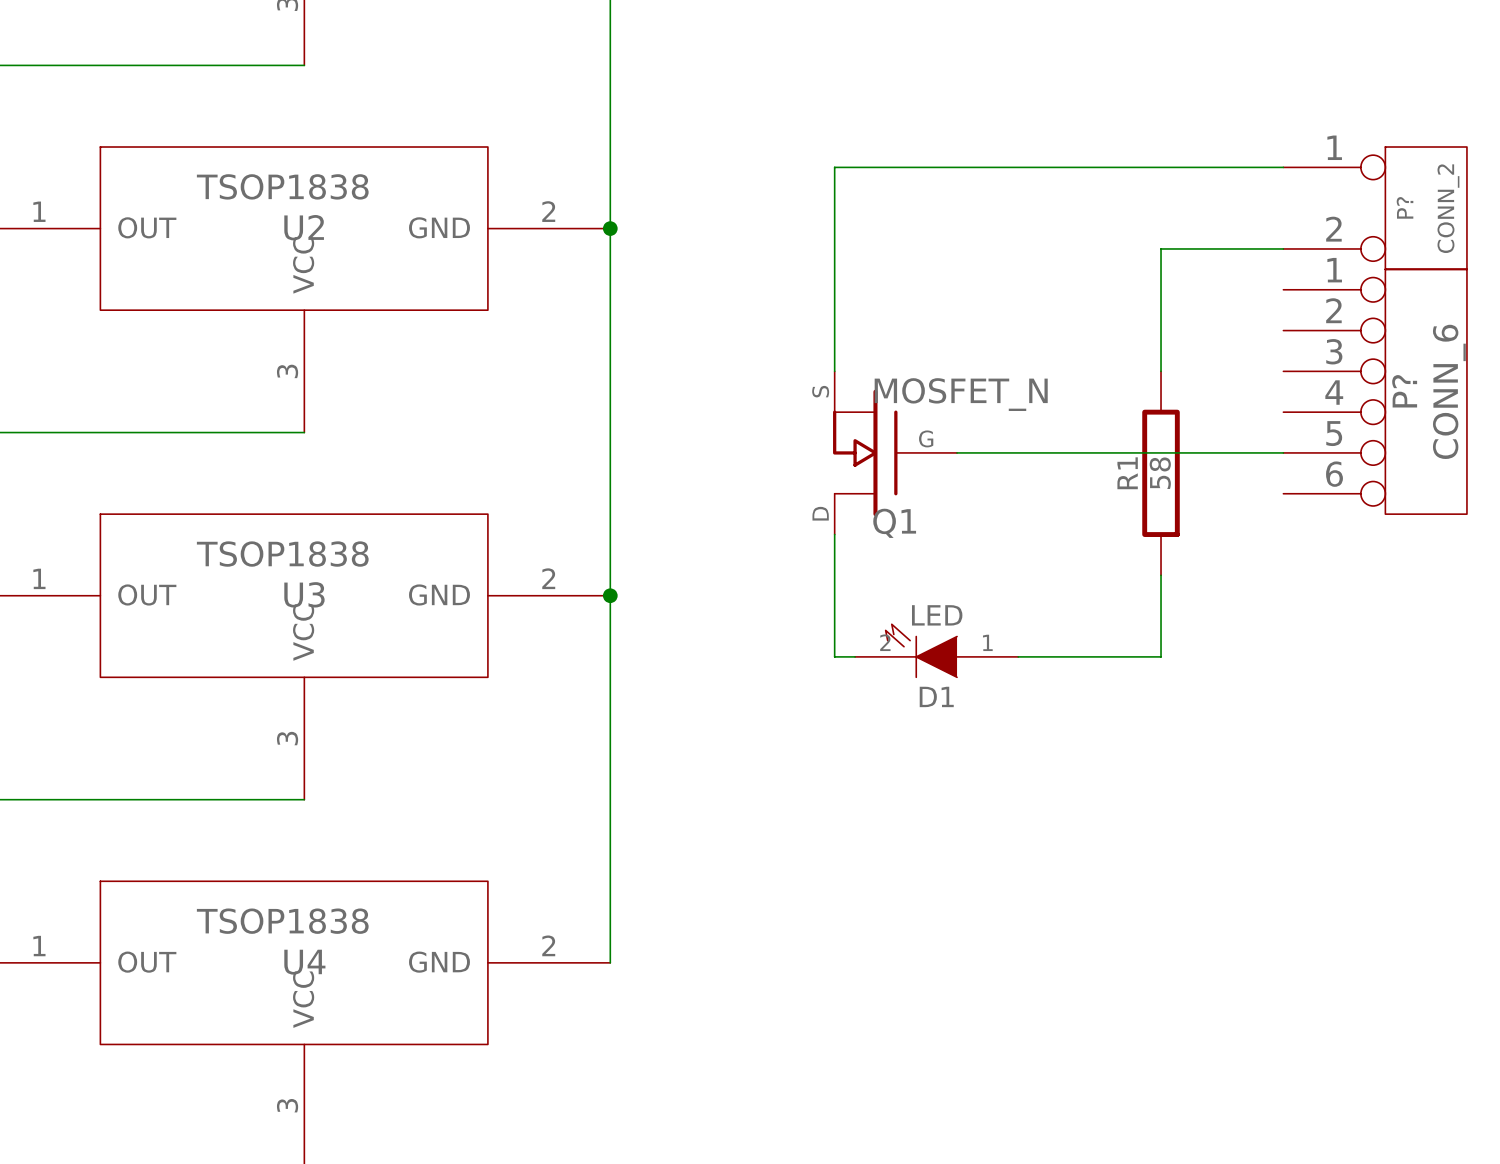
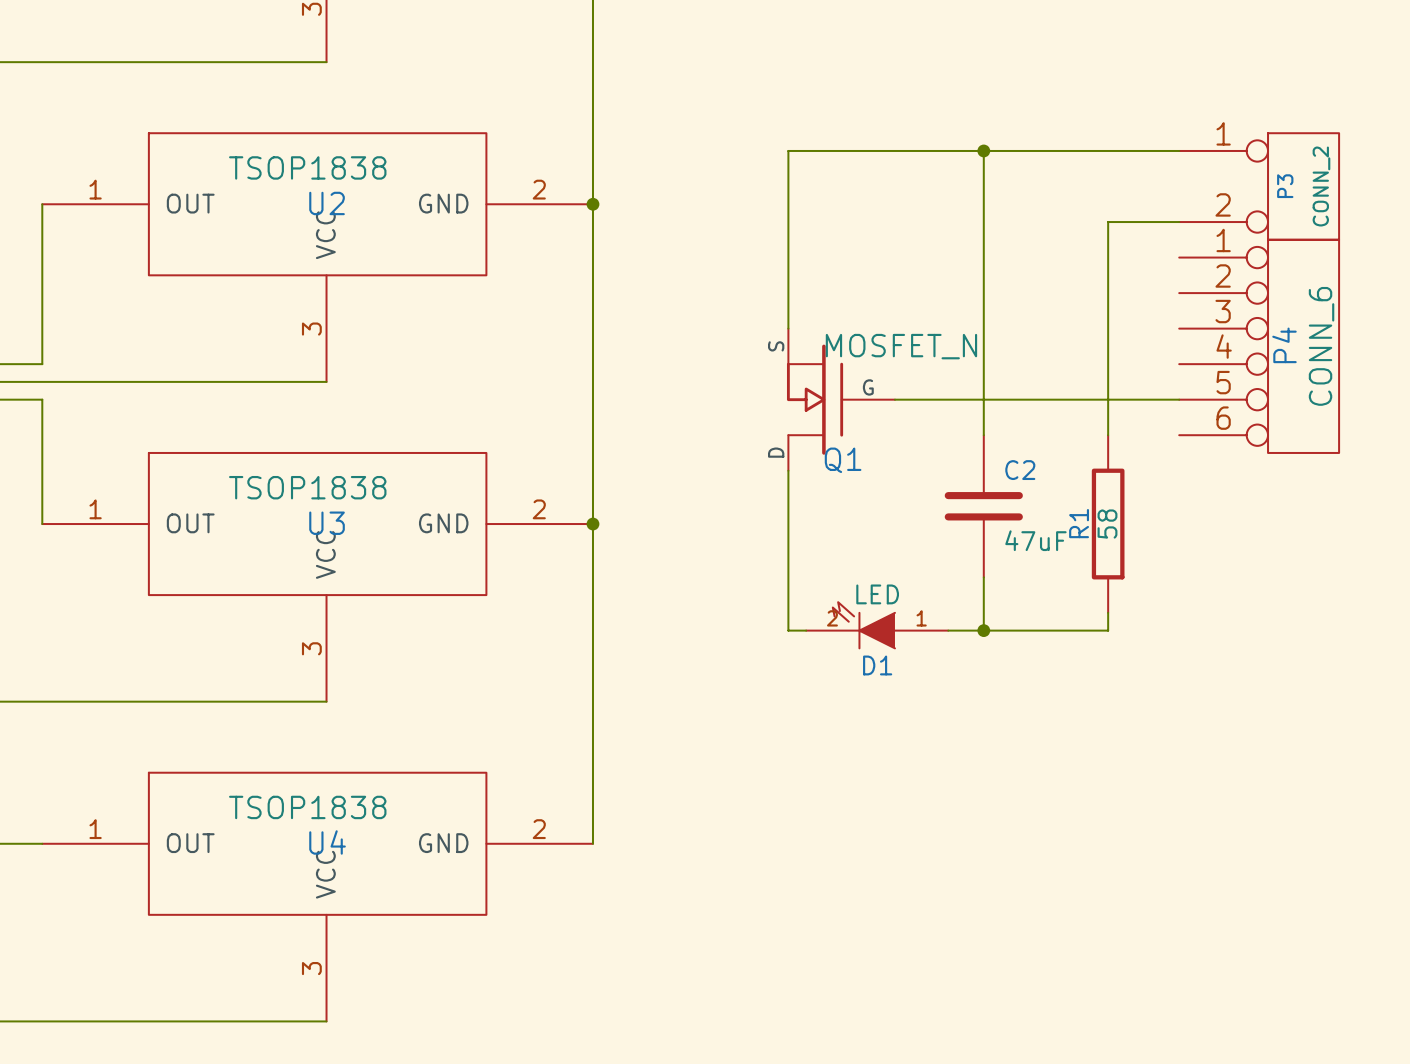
wire: none -> (983, 150) (983, 435)
junction: none -> (983, 150)
P? name: P? (1405, 207) -> P3 (1285, 186)
wire: (1201, 248) (1161, 248) (1161, 371) -> (1108, 222) (1108, 435)
P? name: P? (1404, 391) -> P4 (1284, 345)
R1 position: (1161, 473) -> (1108, 524)
C2: none -> 47uF (983, 506)
wire: (1161, 575) (1161, 656) (1018, 656) -> none
D1 position: (936, 650) -> (877, 625)
wire: (834, 656) (855, 656) -> (788, 577) (788, 630) (806, 630)
wire: none -> (983, 577) (983, 630)
wire: none -> (1108, 612) (1108, 630) (948, 630)
junction: none -> (983, 630)

